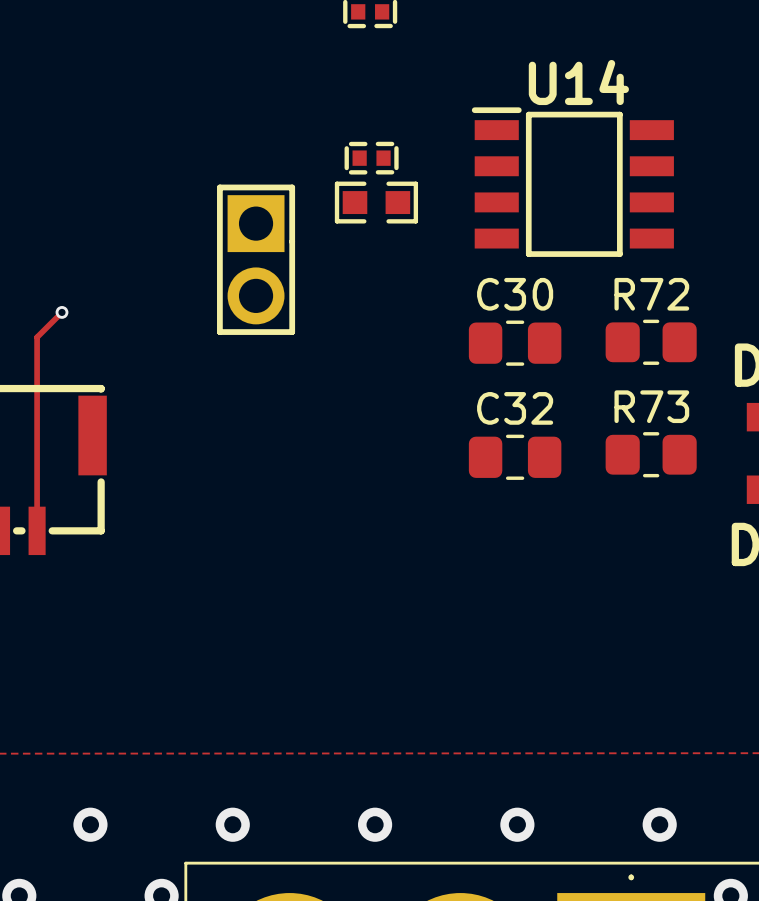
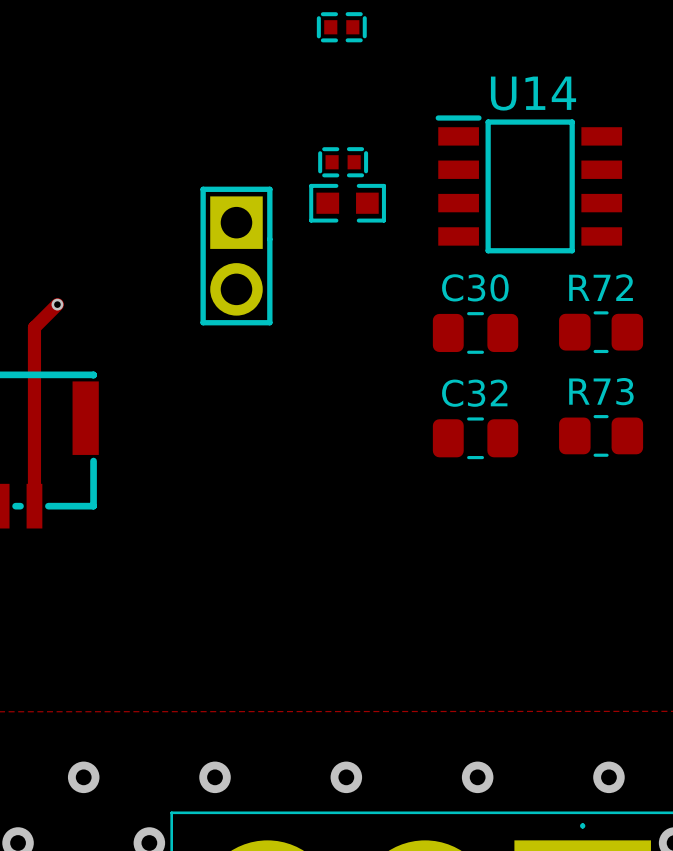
track width: thin (62, 312) (37, 337) (37, 530) -> thick (57, 304) (34, 327) (34, 506)

